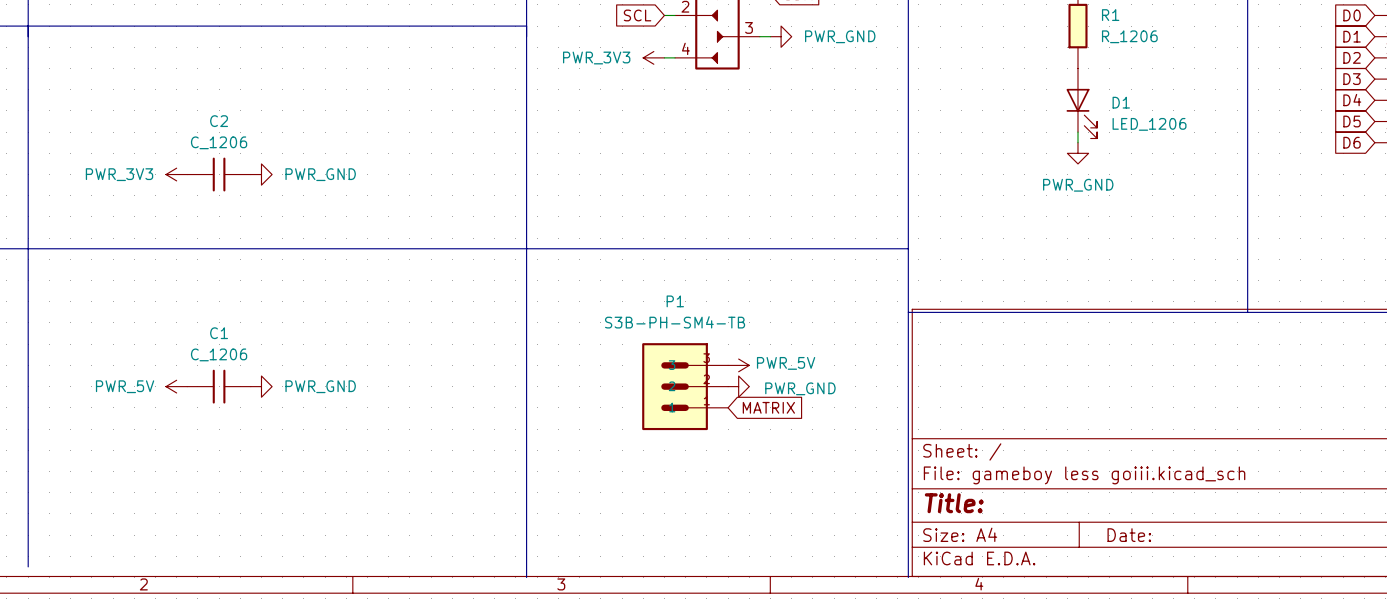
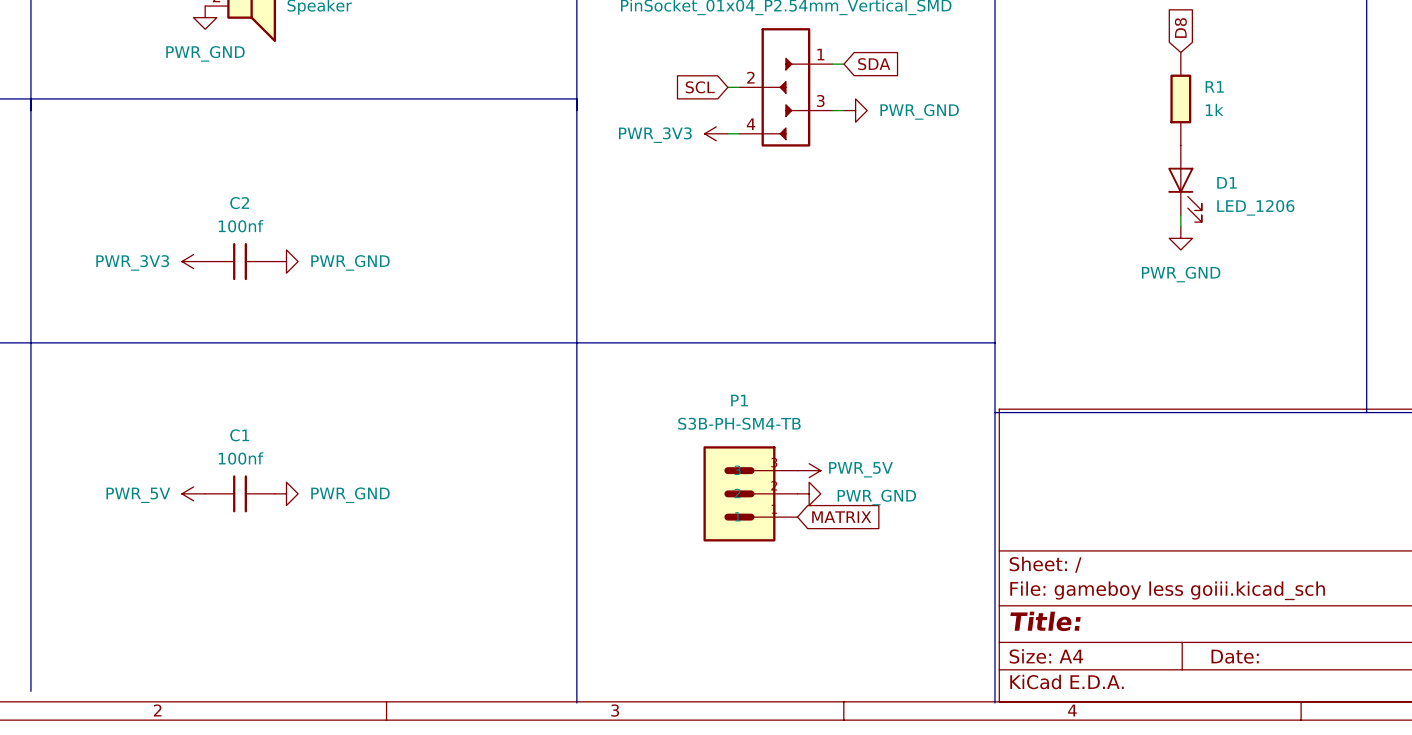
R1 value: R_1206 (1129, 36) -> 1k (1214, 109)
C2 value: C_1206 (219, 142) -> 100nf (241, 226)
C1 value: C_1206 (219, 354) -> 100nf (241, 458)

